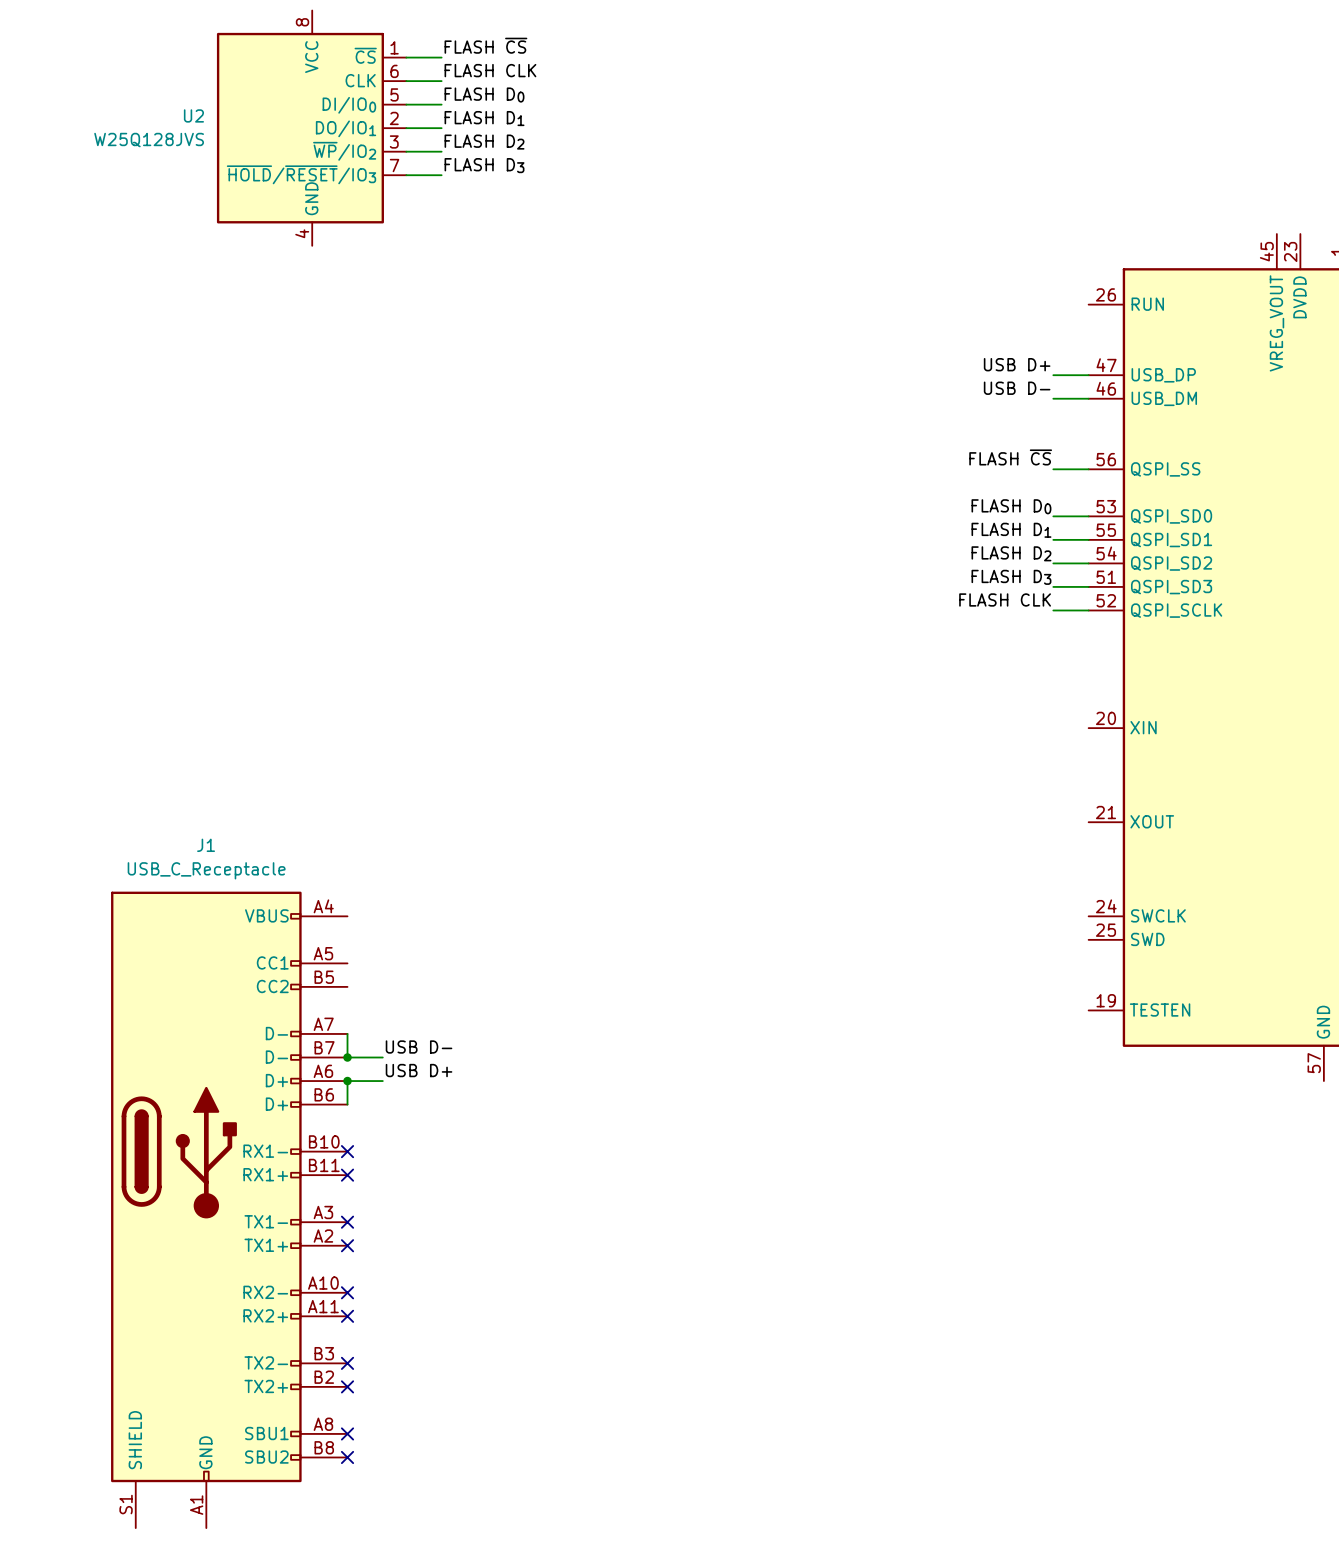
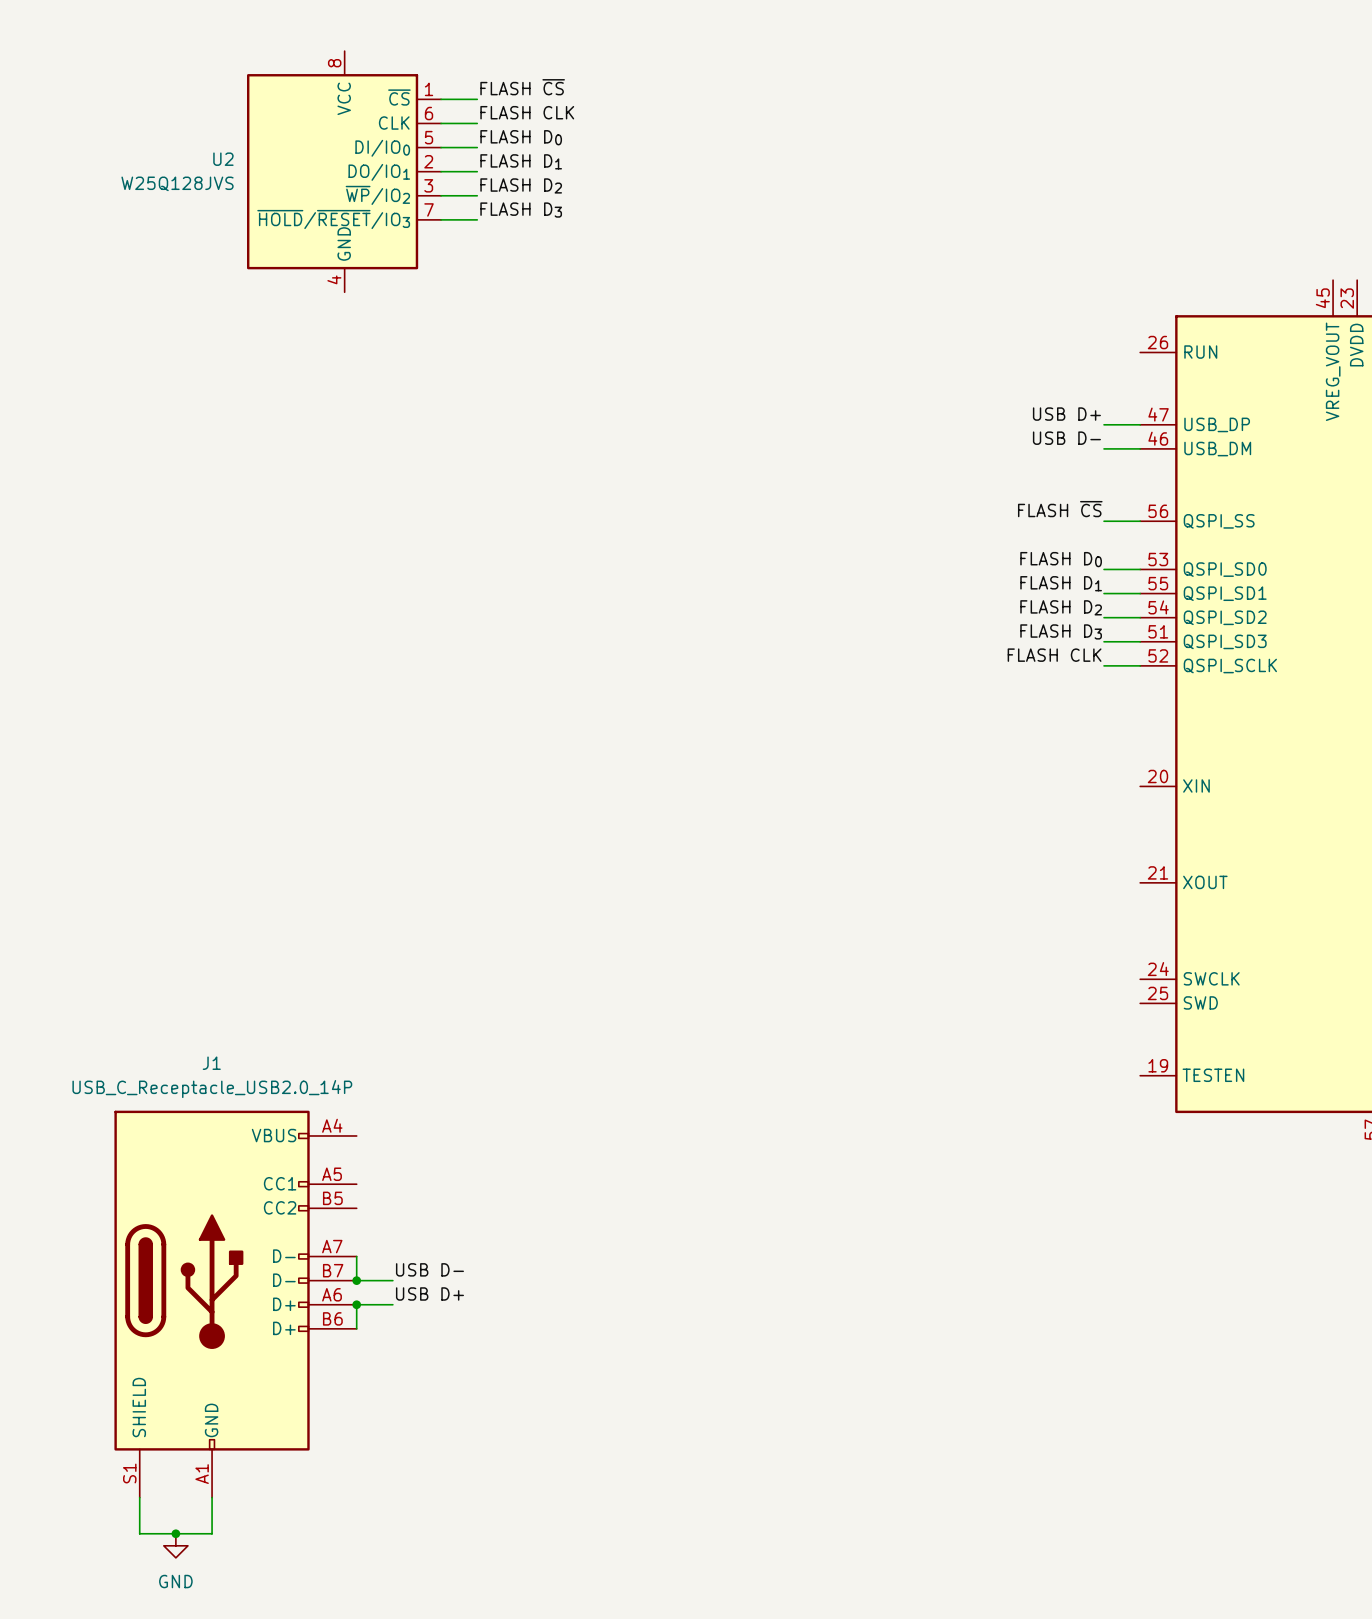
J1 name position: J1 (206, 845) -> J1 (211, 1063)
J1 value: USB_C_Receptacle (206, 870) -> USB_C_Receptacle_USB2.0_14P (212, 1089)
J1 symbol: [111, 891, 348, 1529] -> [114, 1110, 357, 1498]
wire: (347, 1033) (347, 1057) (382, 1057) -> (356, 1256) (356, 1280) (392, 1280)
label position: USB D- (419, 1047) -> USB D- (429, 1269)
junction: (347, 1057) -> none
label position: USB D+ (419, 1070) -> USB D+ (429, 1293)
junction: (347, 1081) -> none
wire: (382, 1081) (347, 1081) (347, 1104) -> (392, 1304) (356, 1304) (356, 1328)
no-connect mark: (347, 1151) -> none
no-connect mark: (347, 1175) -> none
junction: none -> (356, 1280)
no-connect mark: (347, 1222) -> none
junction: none -> (356, 1304)
no-connect mark: (347, 1245) -> none
no-connect mark: (347, 1292) -> none
no-connect mark: (347, 1316) -> none
no-connect mark: (347, 1363) -> none
no-connect mark: (347, 1386) -> none
no-connect mark: (347, 1433) -> none
junction: none -> (175, 1533)
no-connect mark: (347, 1457) -> none
power symbol: none -> GND (175, 1545)

